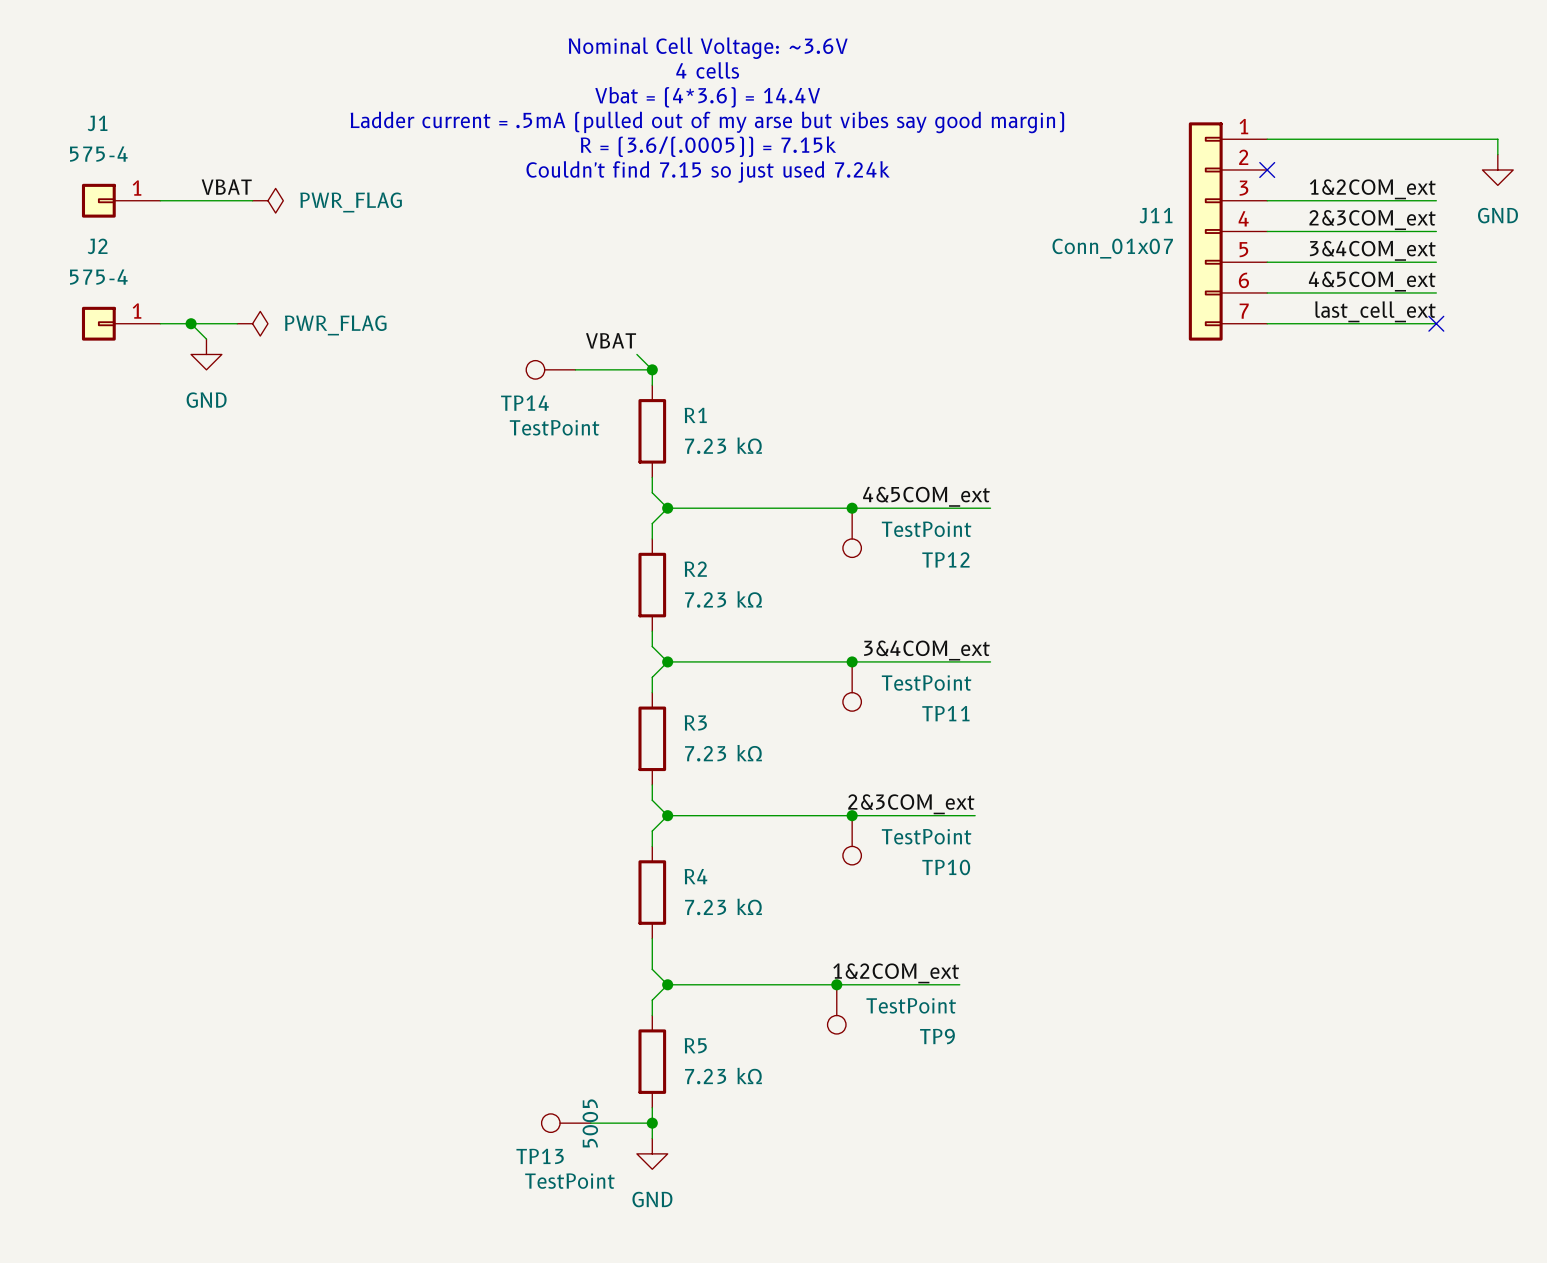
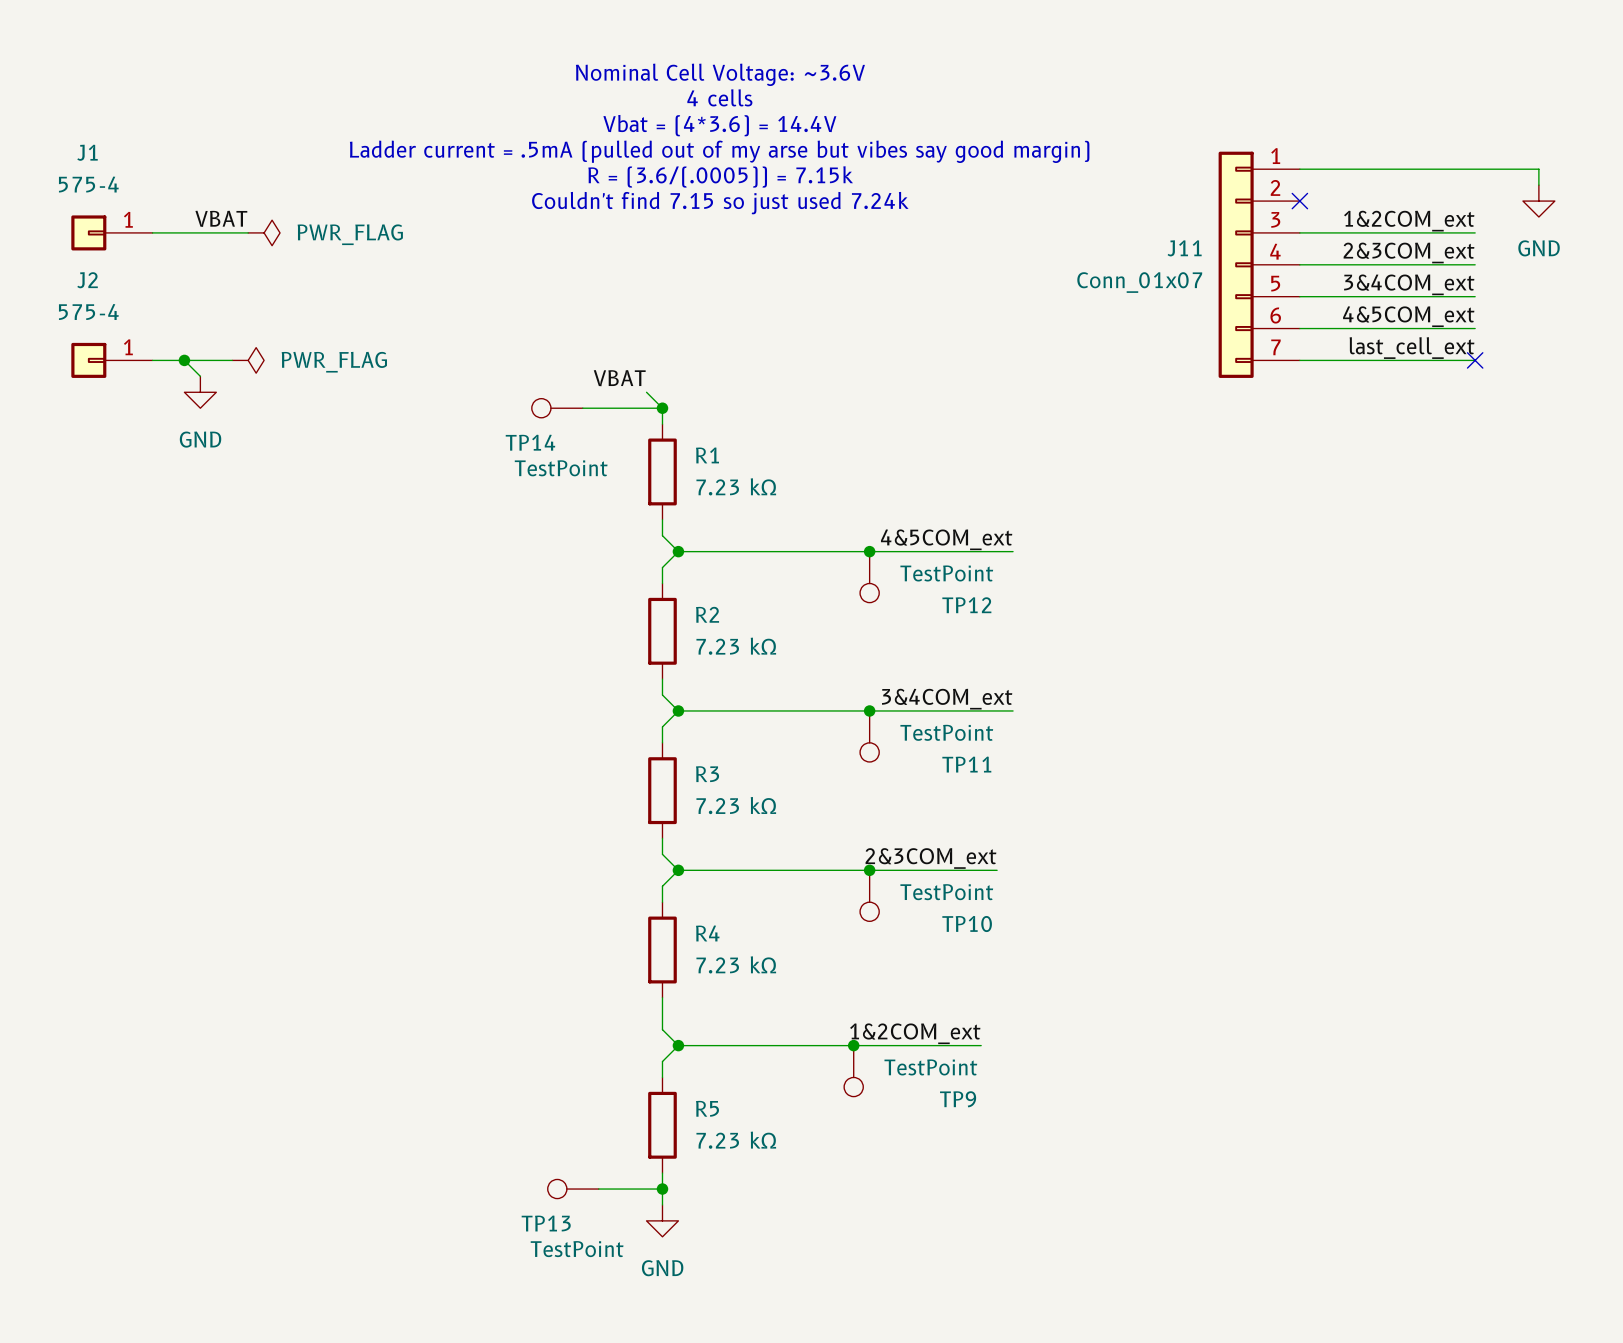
TP13 text: 5005 (590, 1123) -> none

